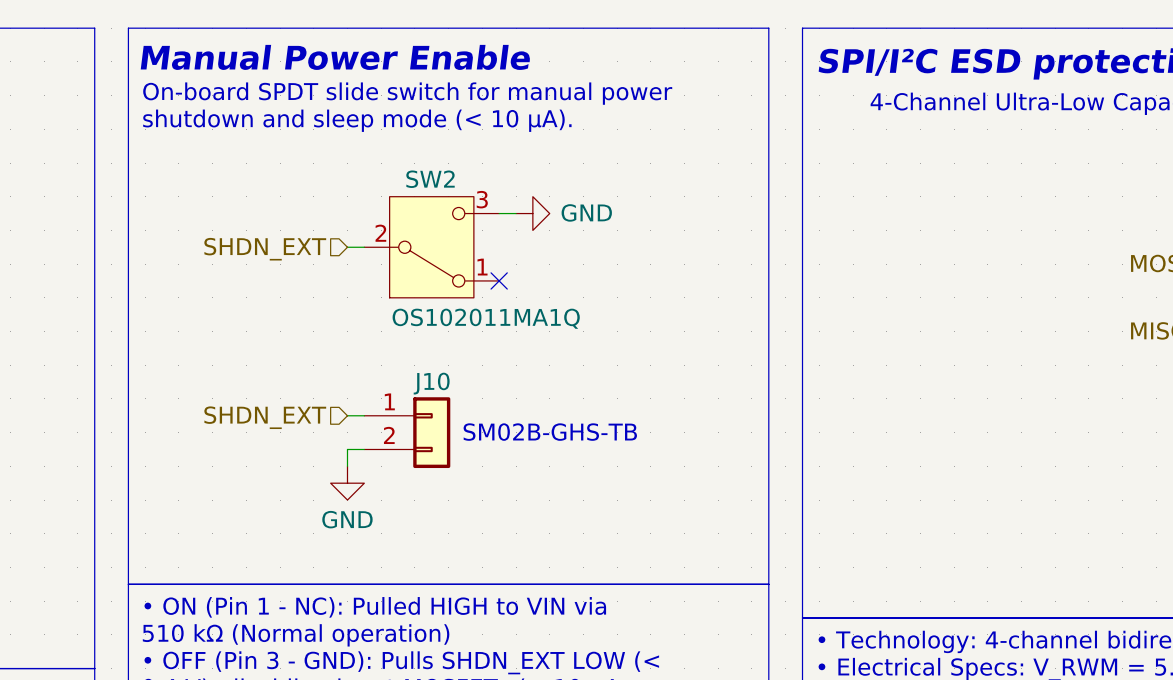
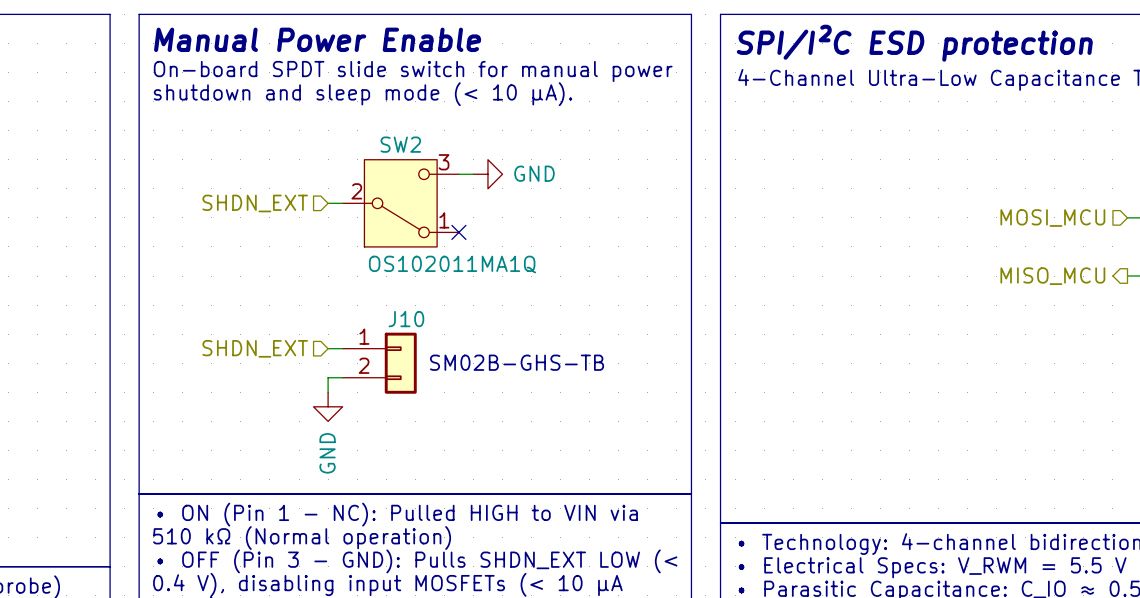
power symbol text rotation: 0° (347, 519) -> 90° counterclockwise (327, 453)

